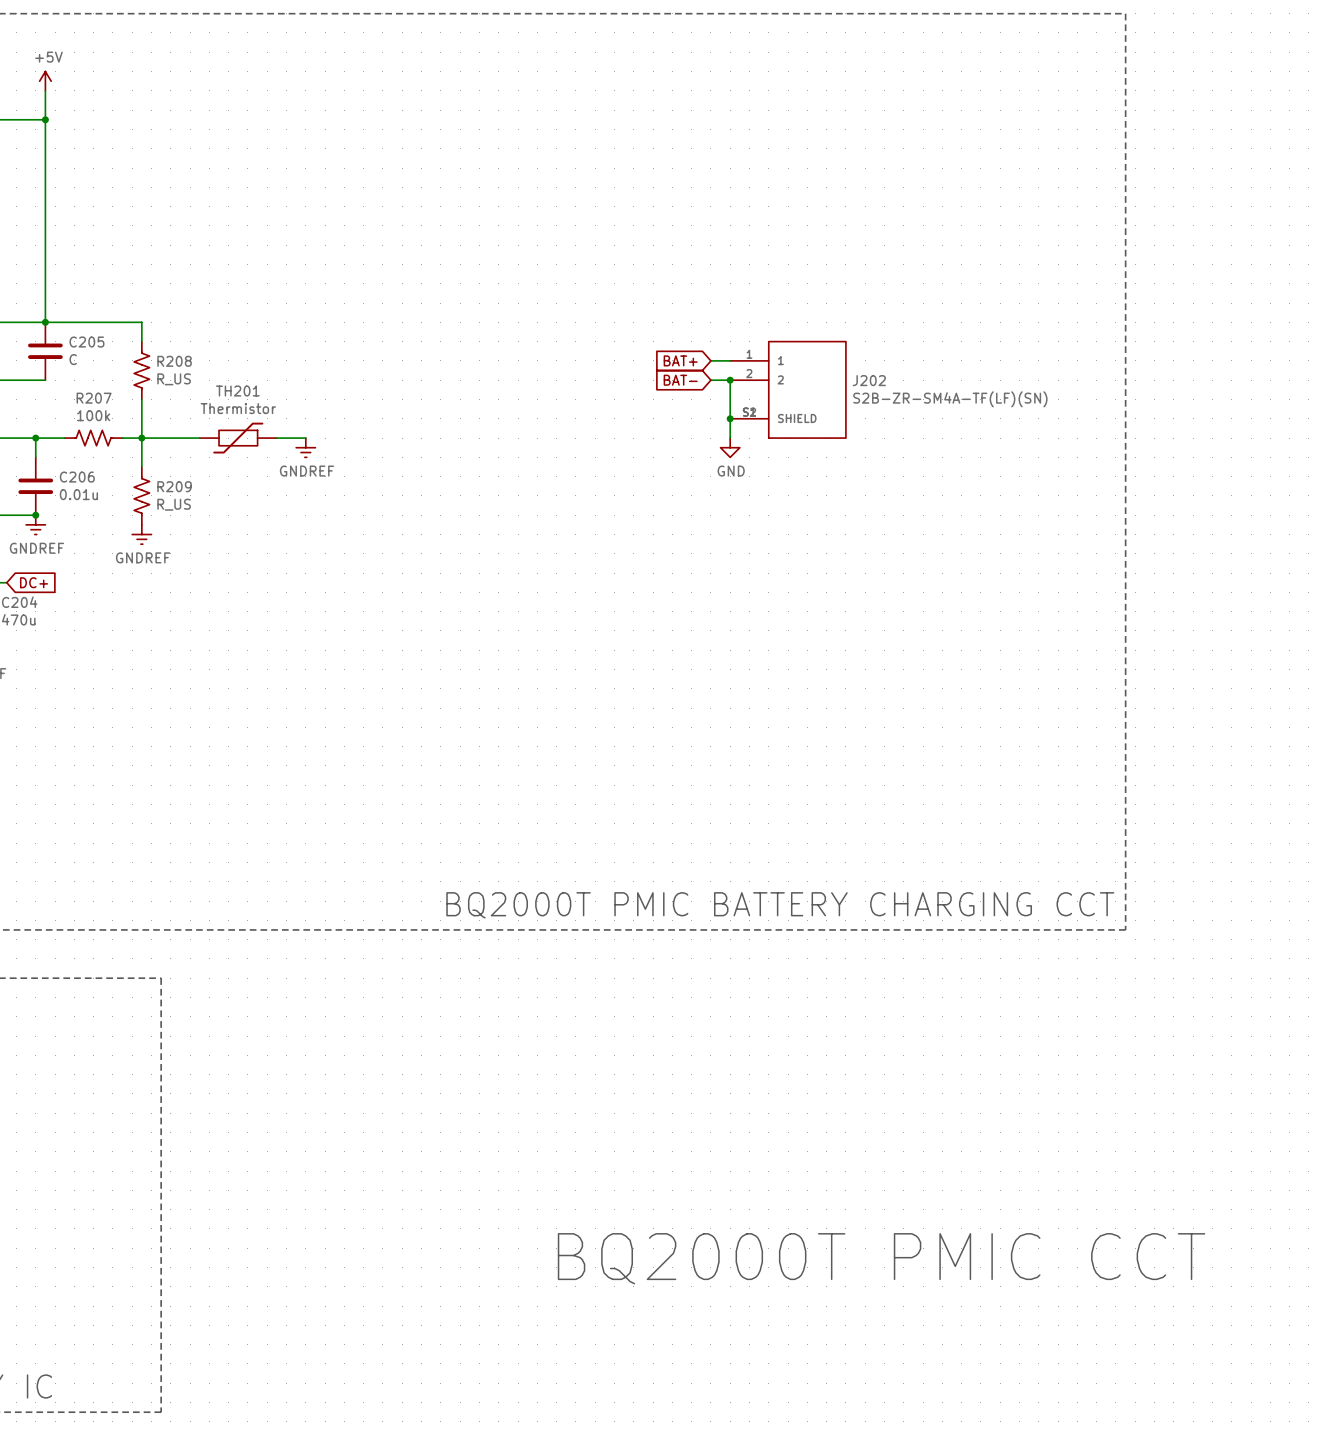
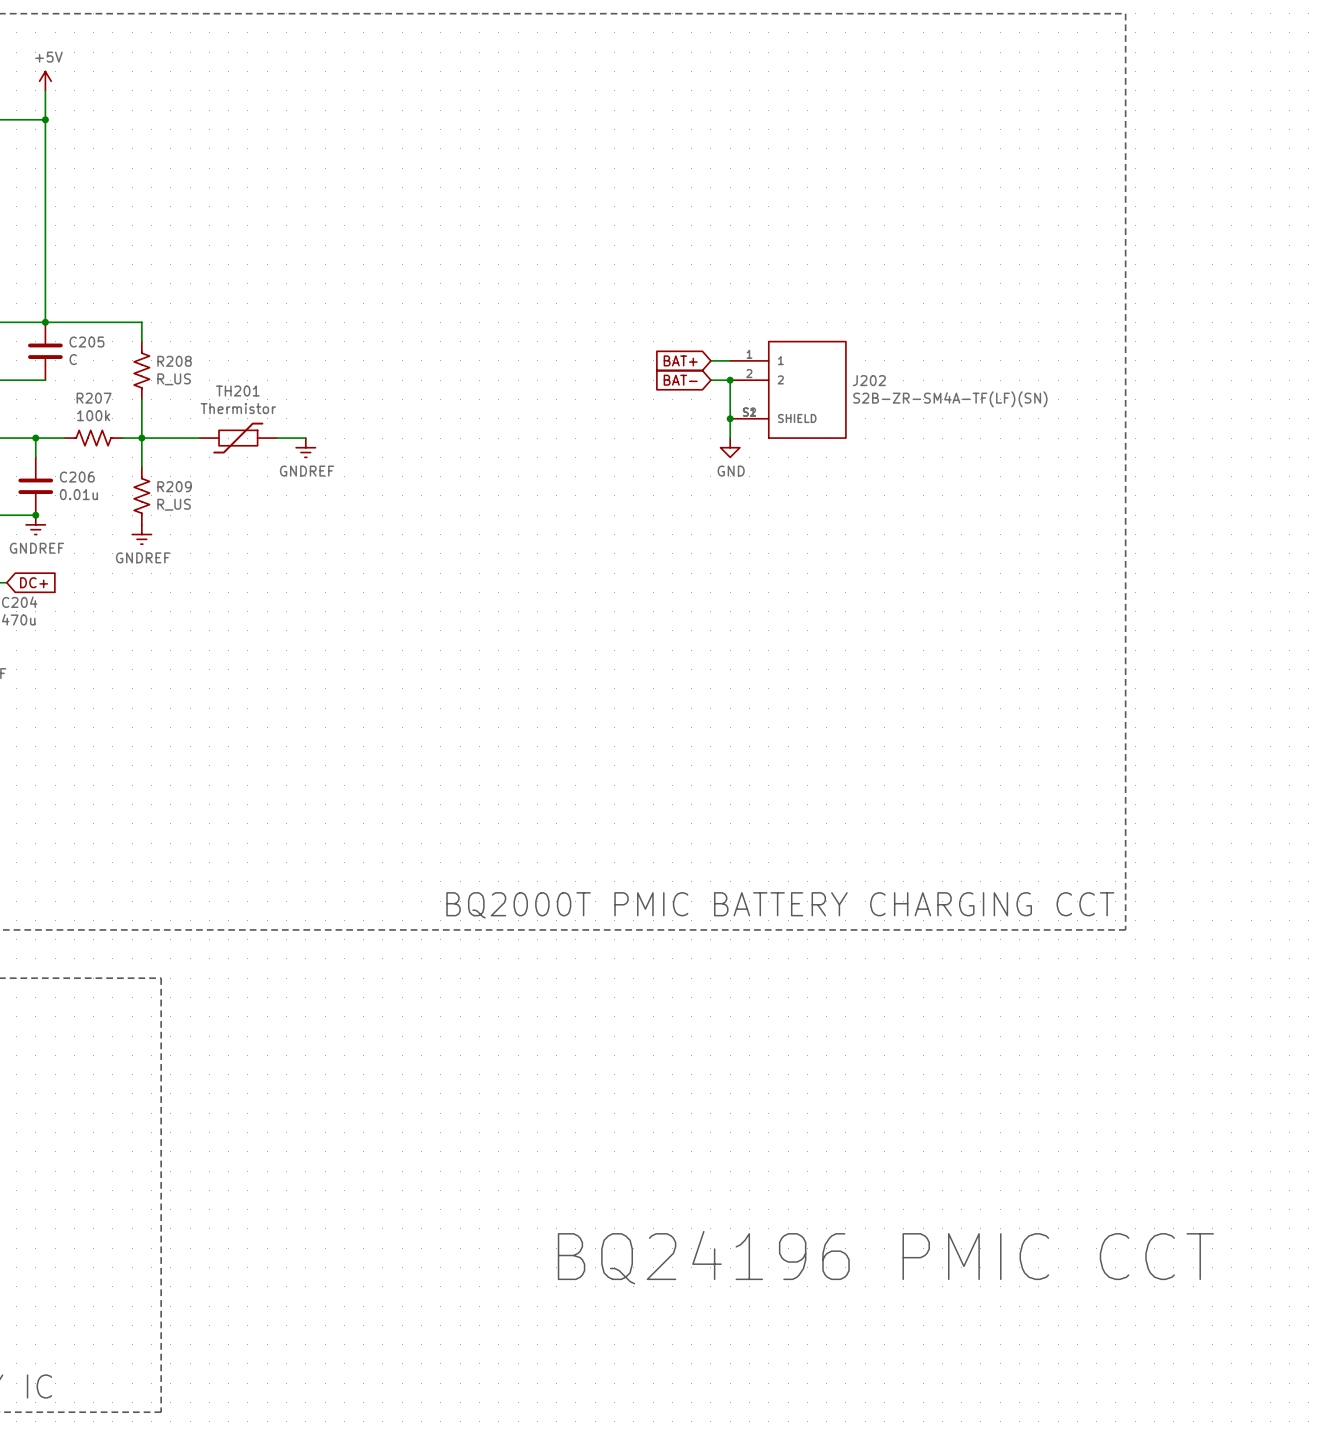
text: BQ2000T PMIC CCT (881, 1258) -> BQ24196 PMIC CCT (885, 1257)

